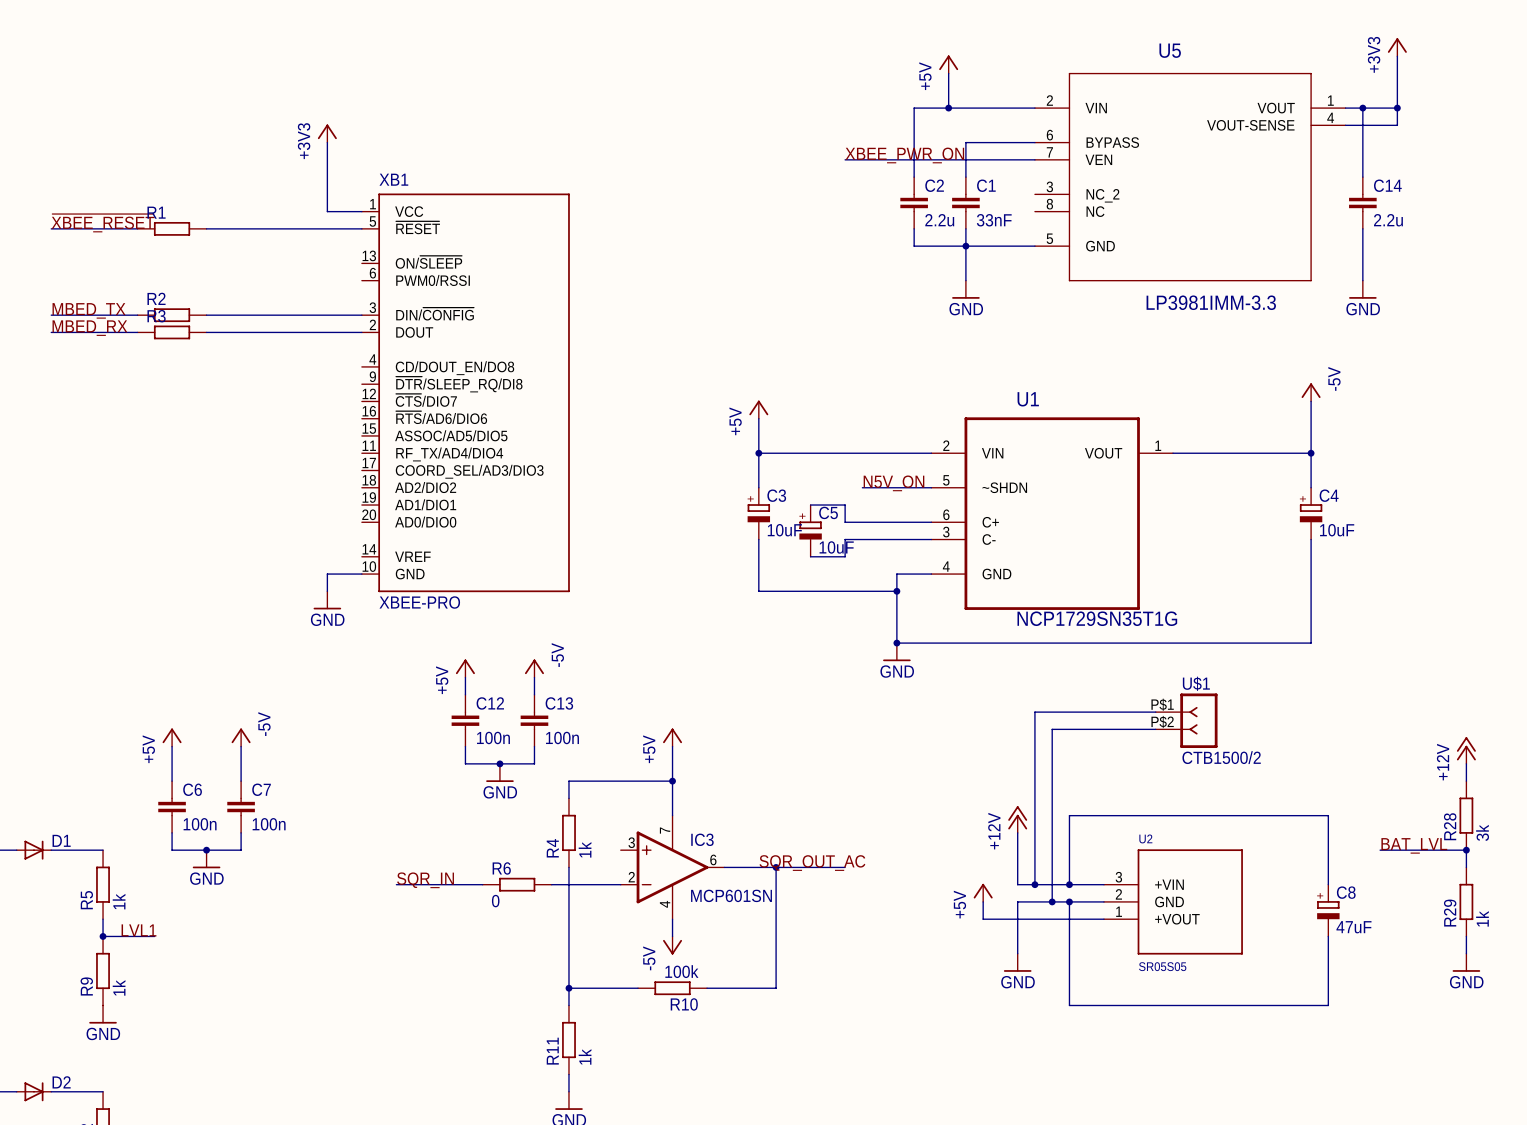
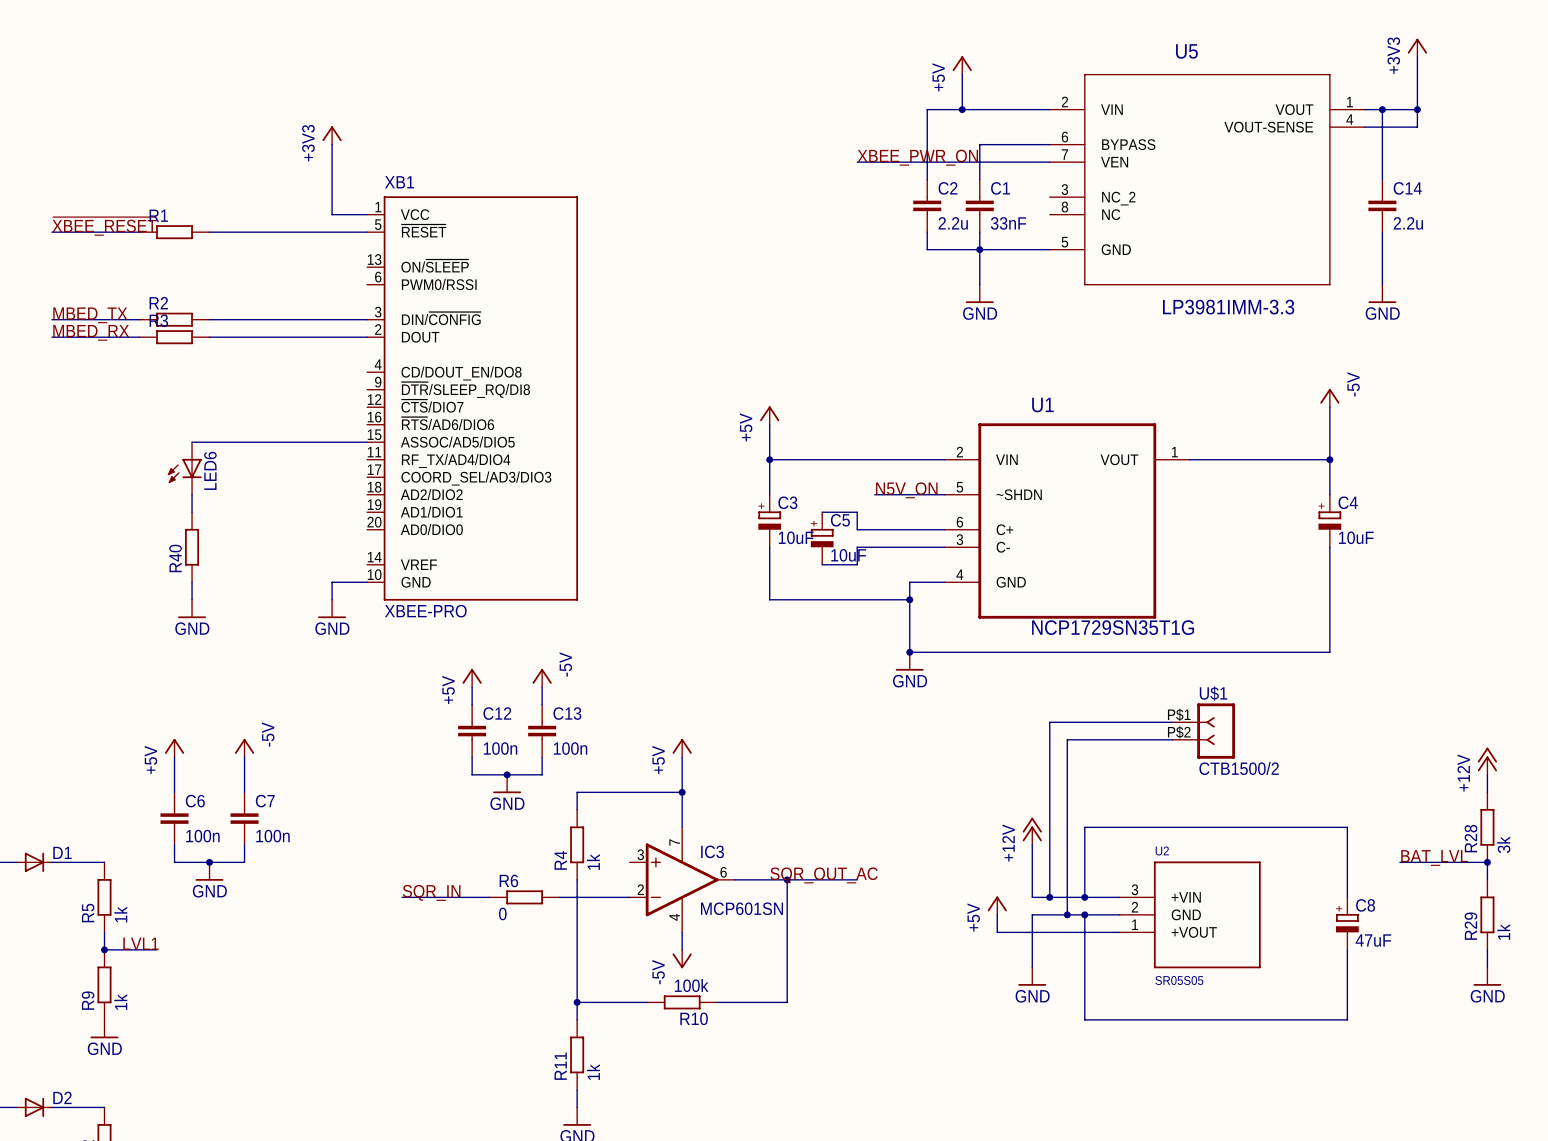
wire: none -> (192, 442) (367, 442)
LED6: none -> (184, 468)
wire: none -> (192, 494) (192, 512)
R40: none -> (192, 547)
wire: none -> (192, 582) (192, 599)
power symbol: none -> GND (192, 608)

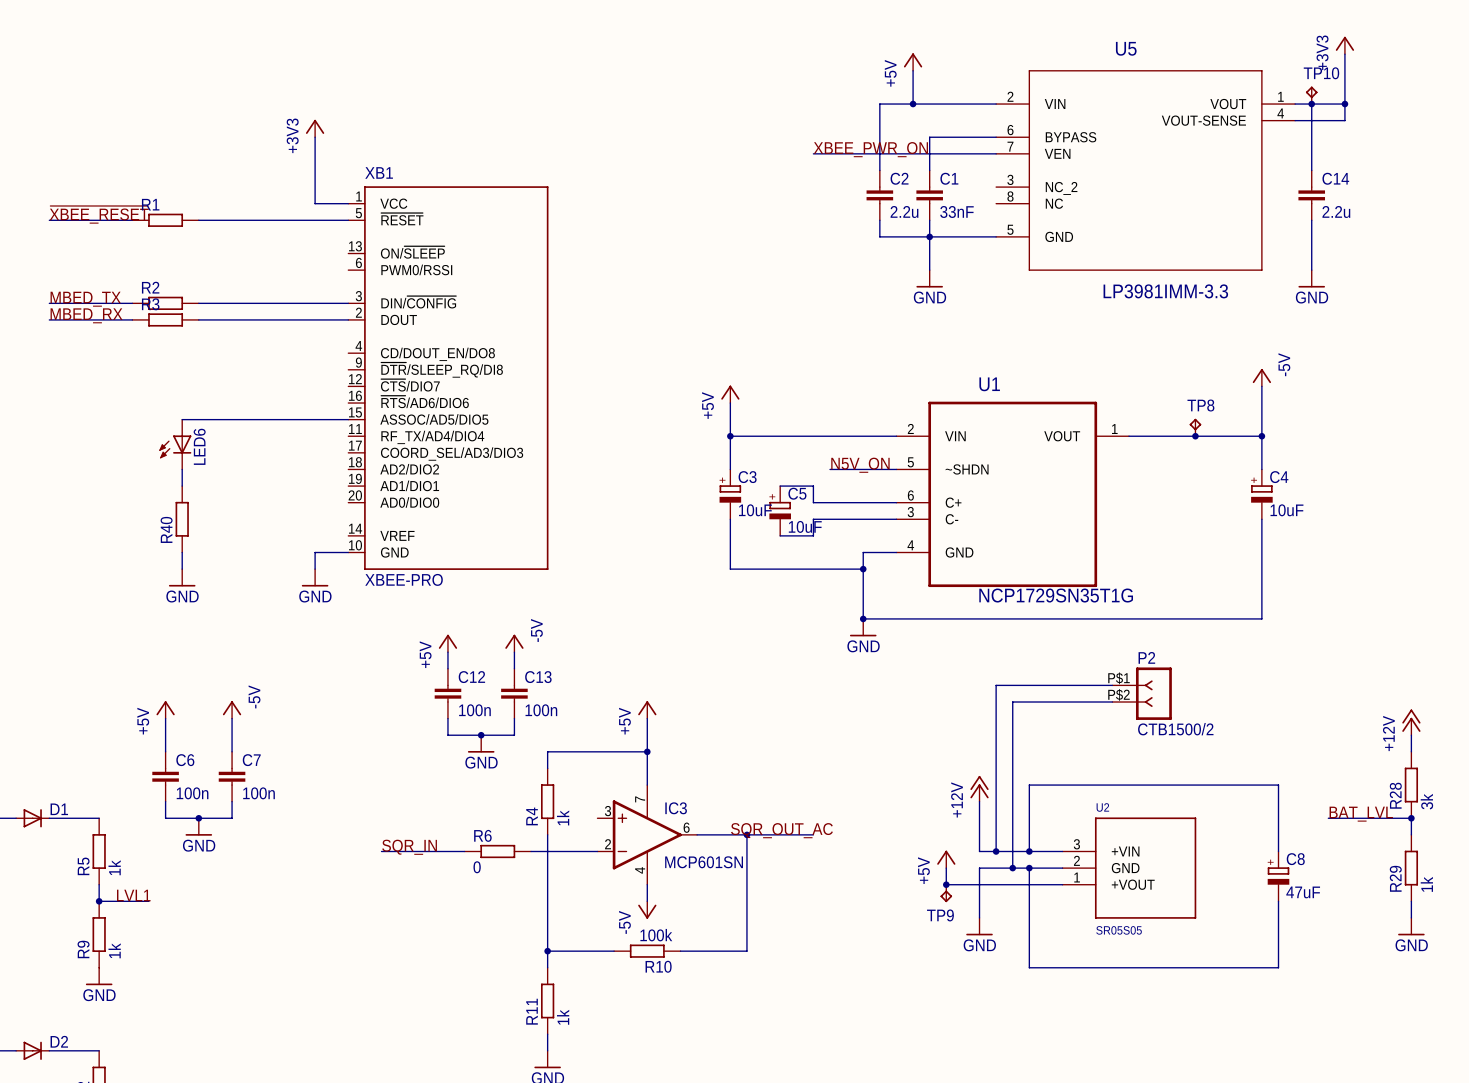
TP10: none -> (1311, 95)
TP8: none -> (1195, 427)
junction: none -> (1195, 436)
U$1 name: U$1 (1213, 693) -> P2 (1146, 657)
junction: none -> (946, 884)
TP9: none -> (946, 893)

